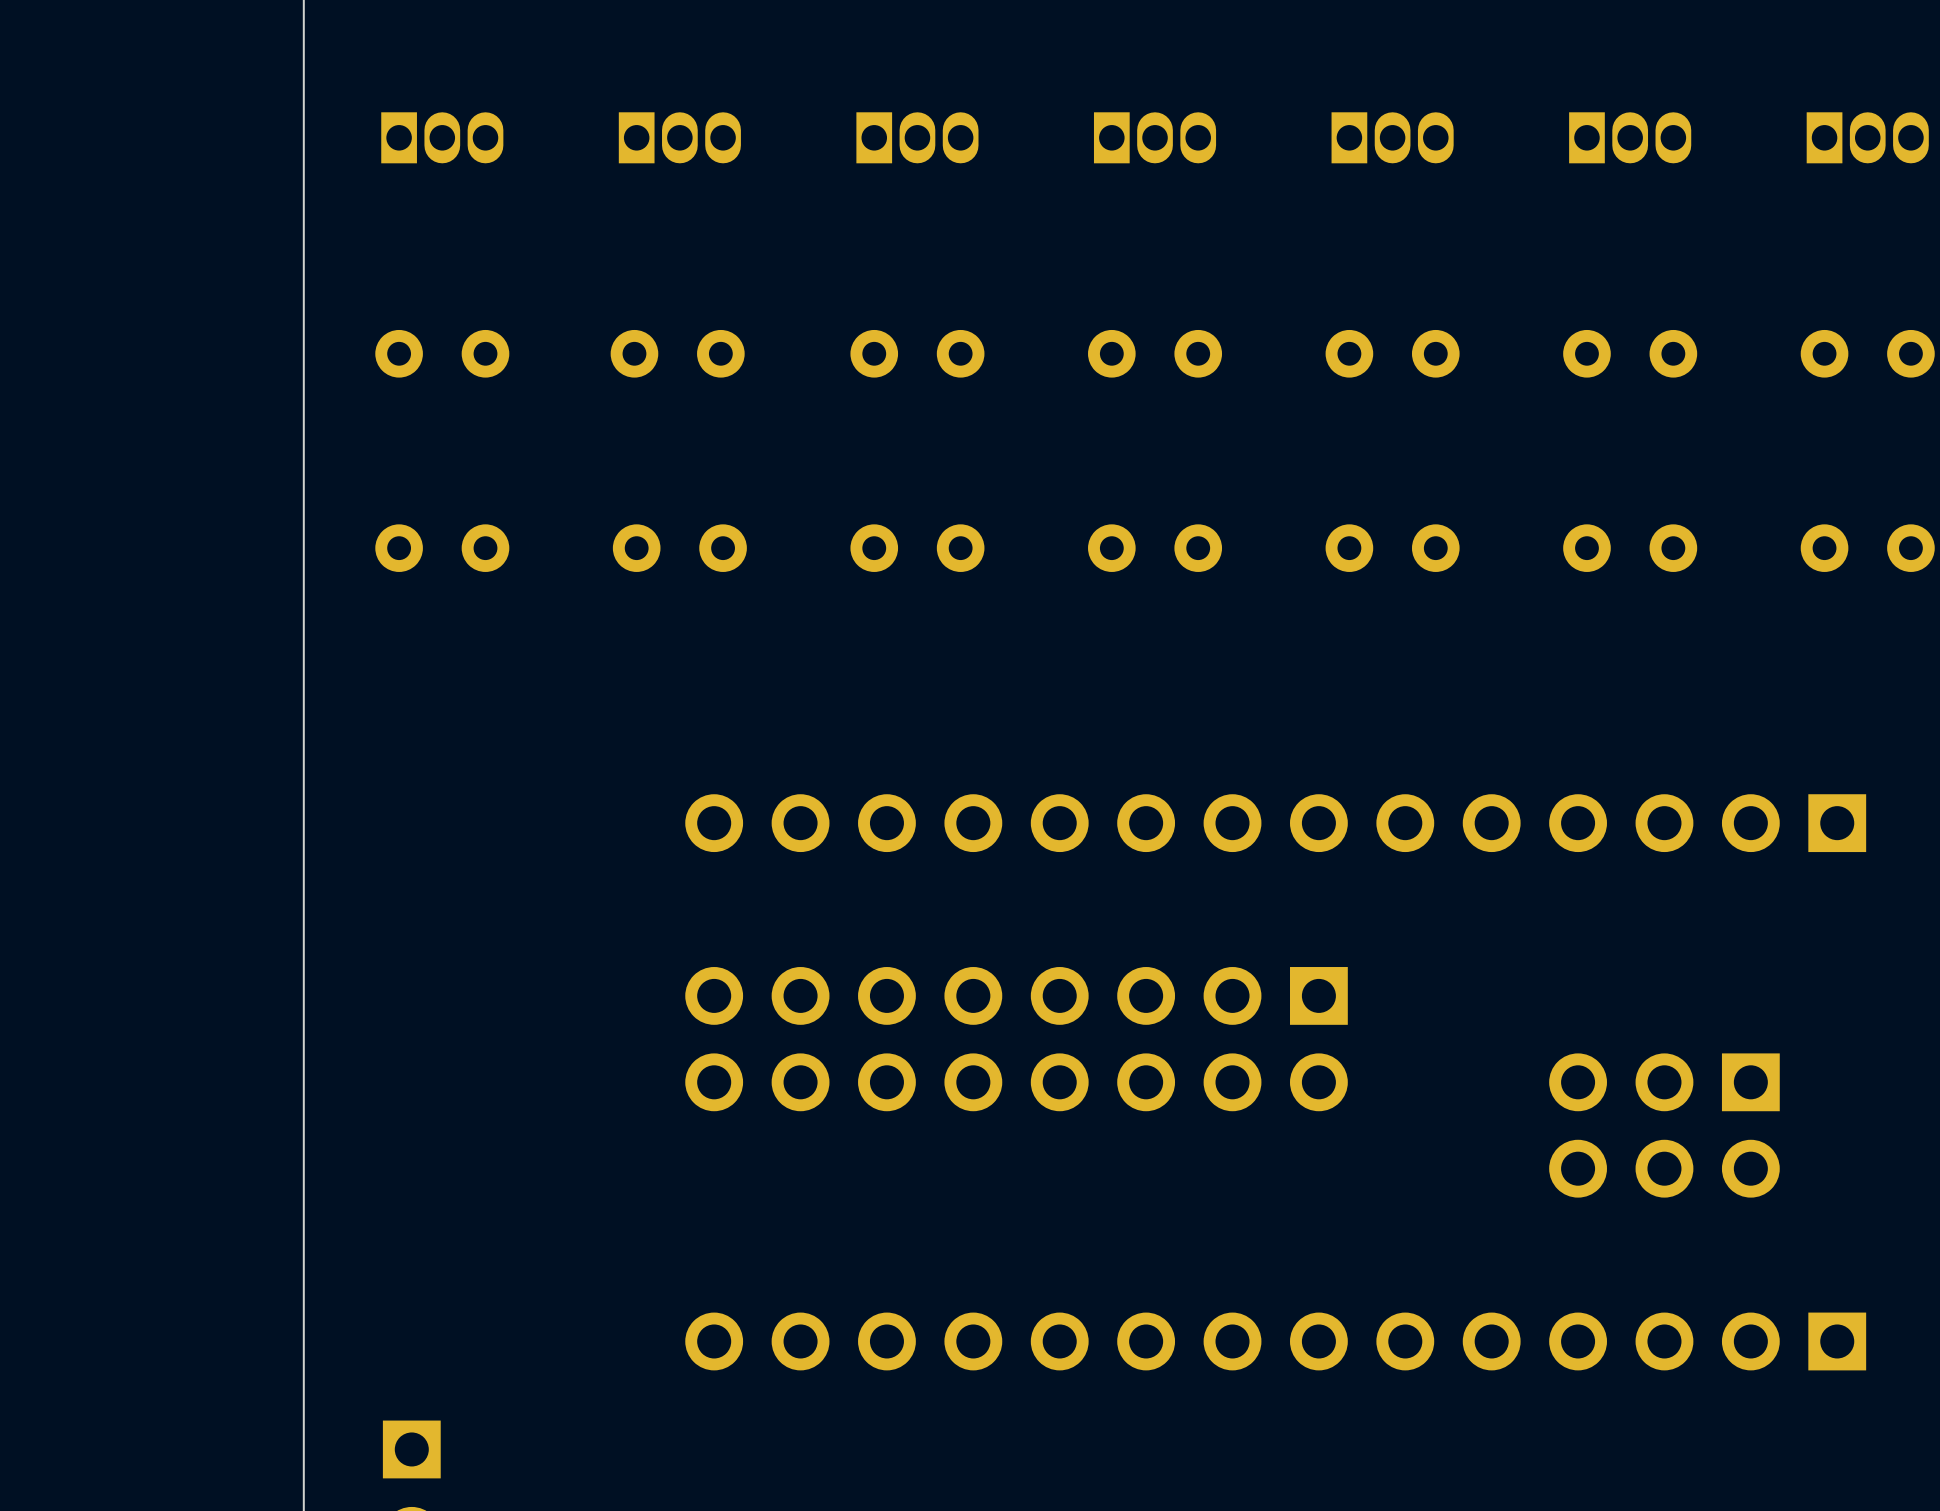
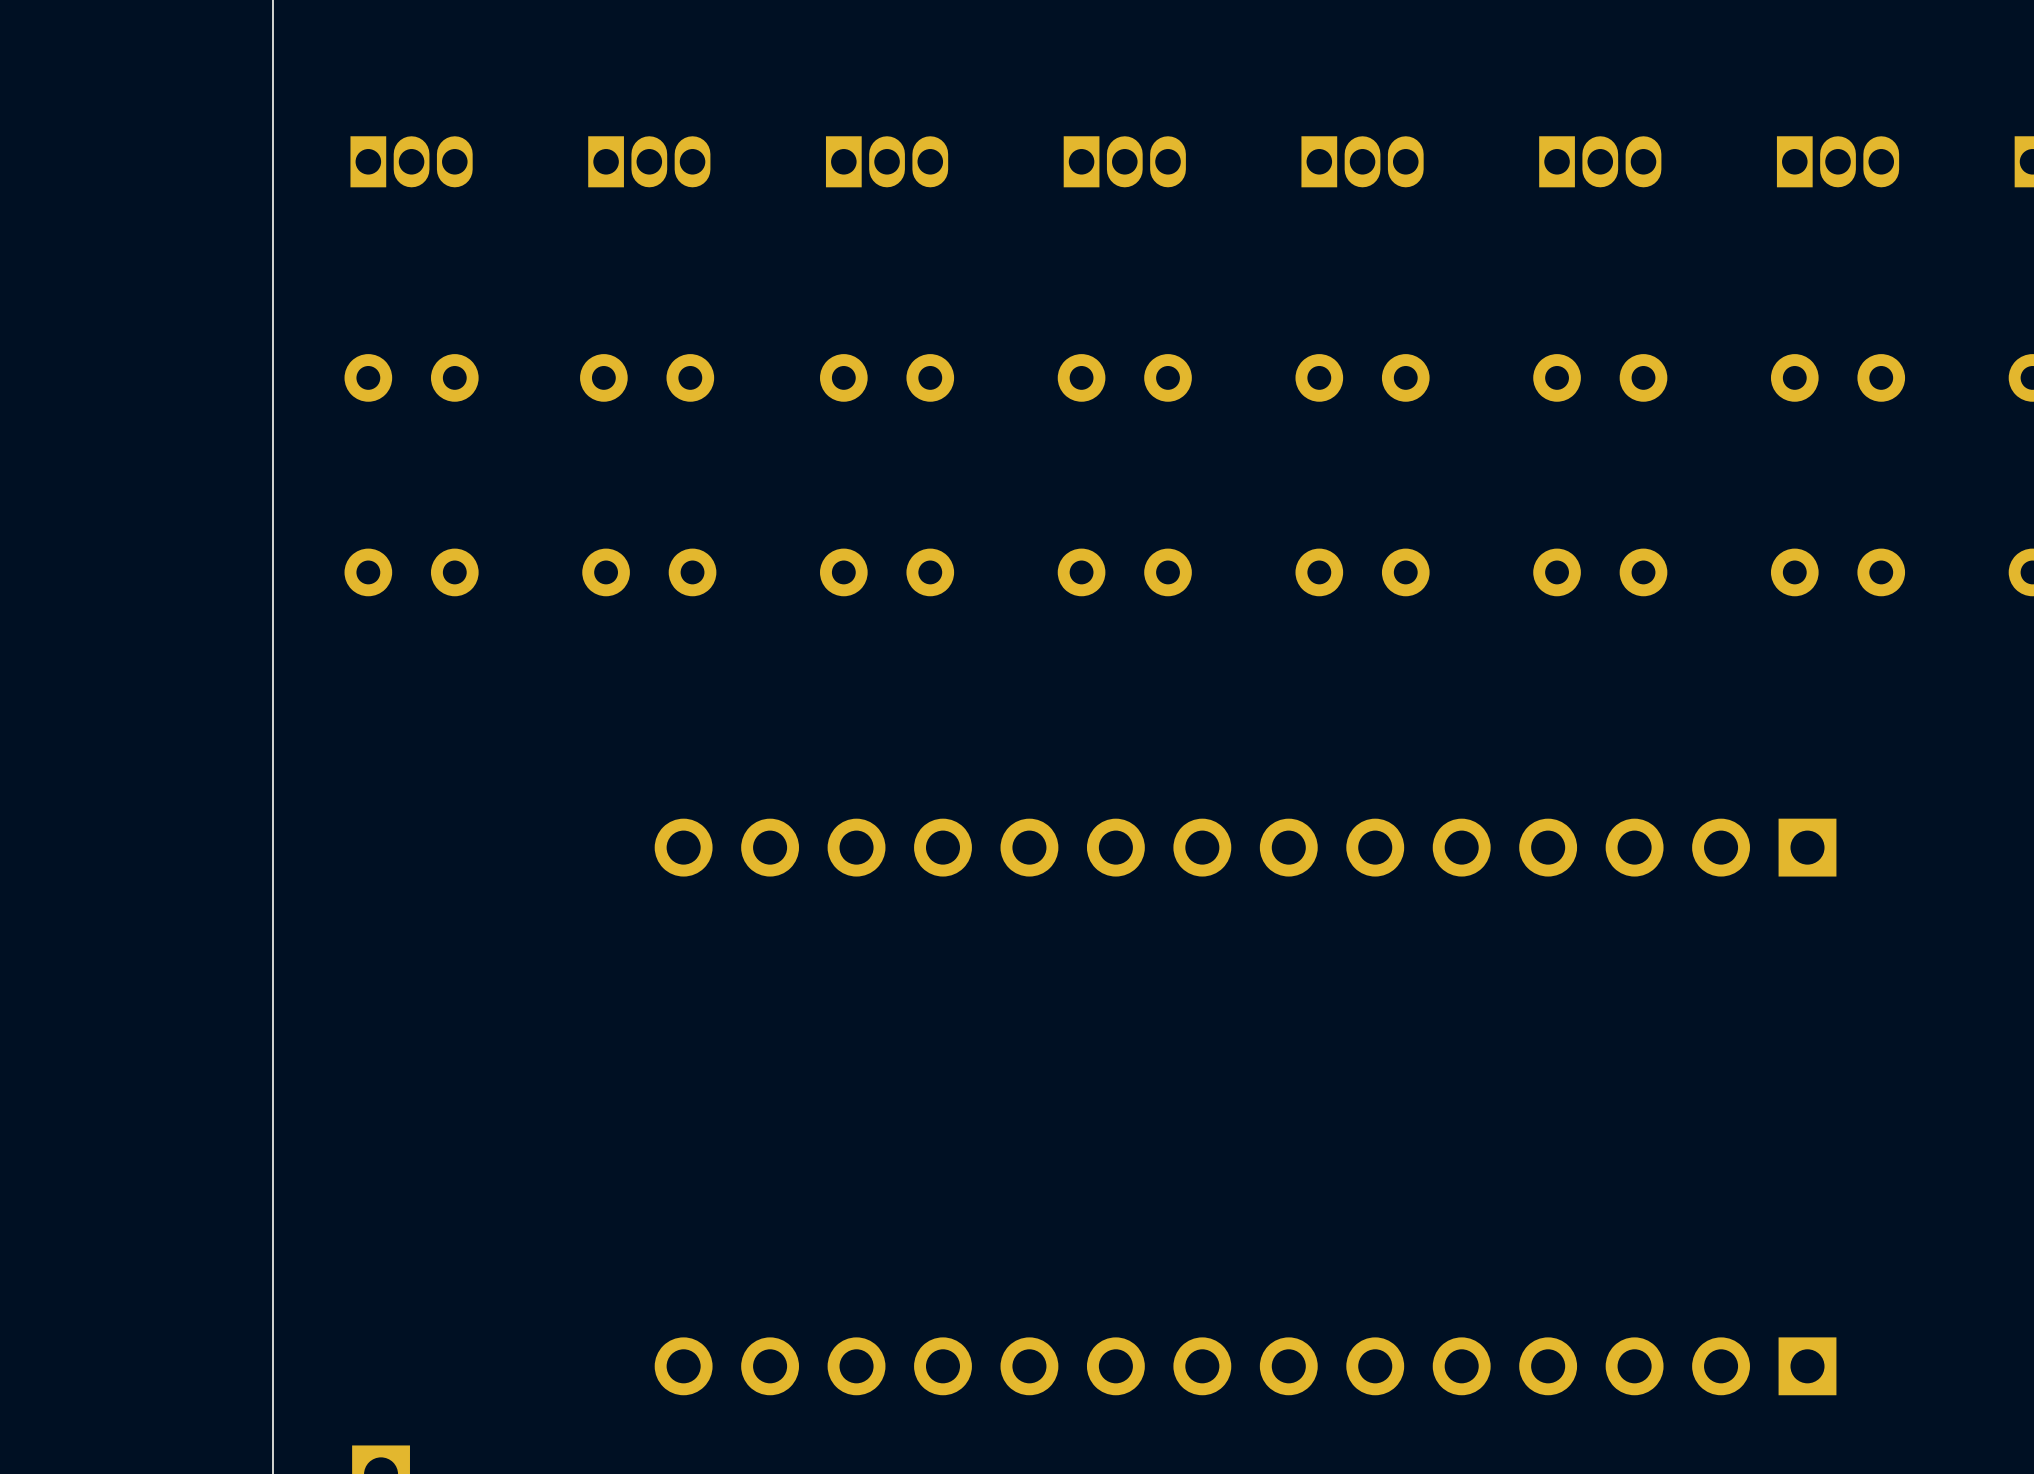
part: (1016, 1039) -> none
part: (1664, 1125) -> none

